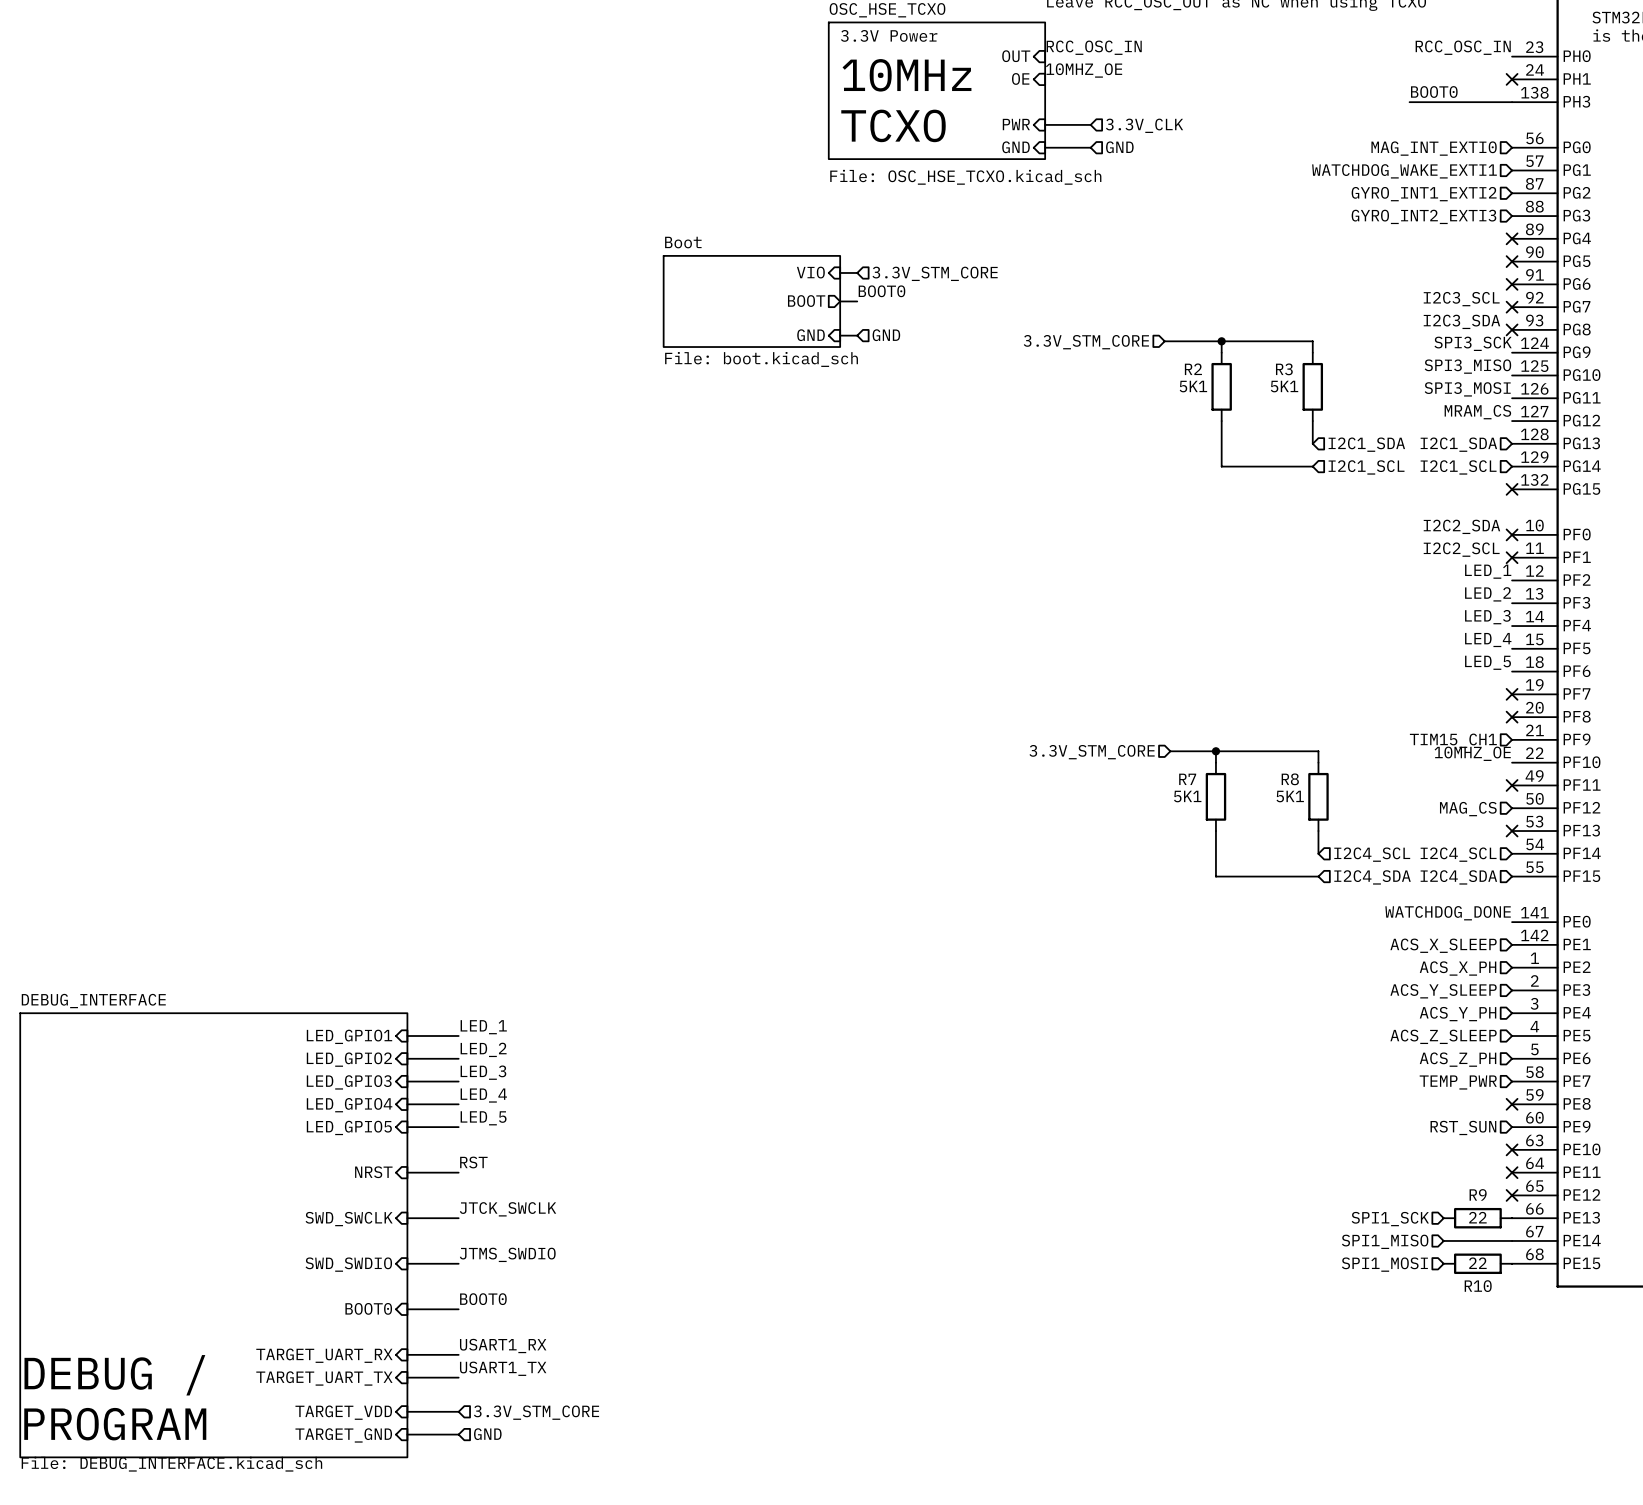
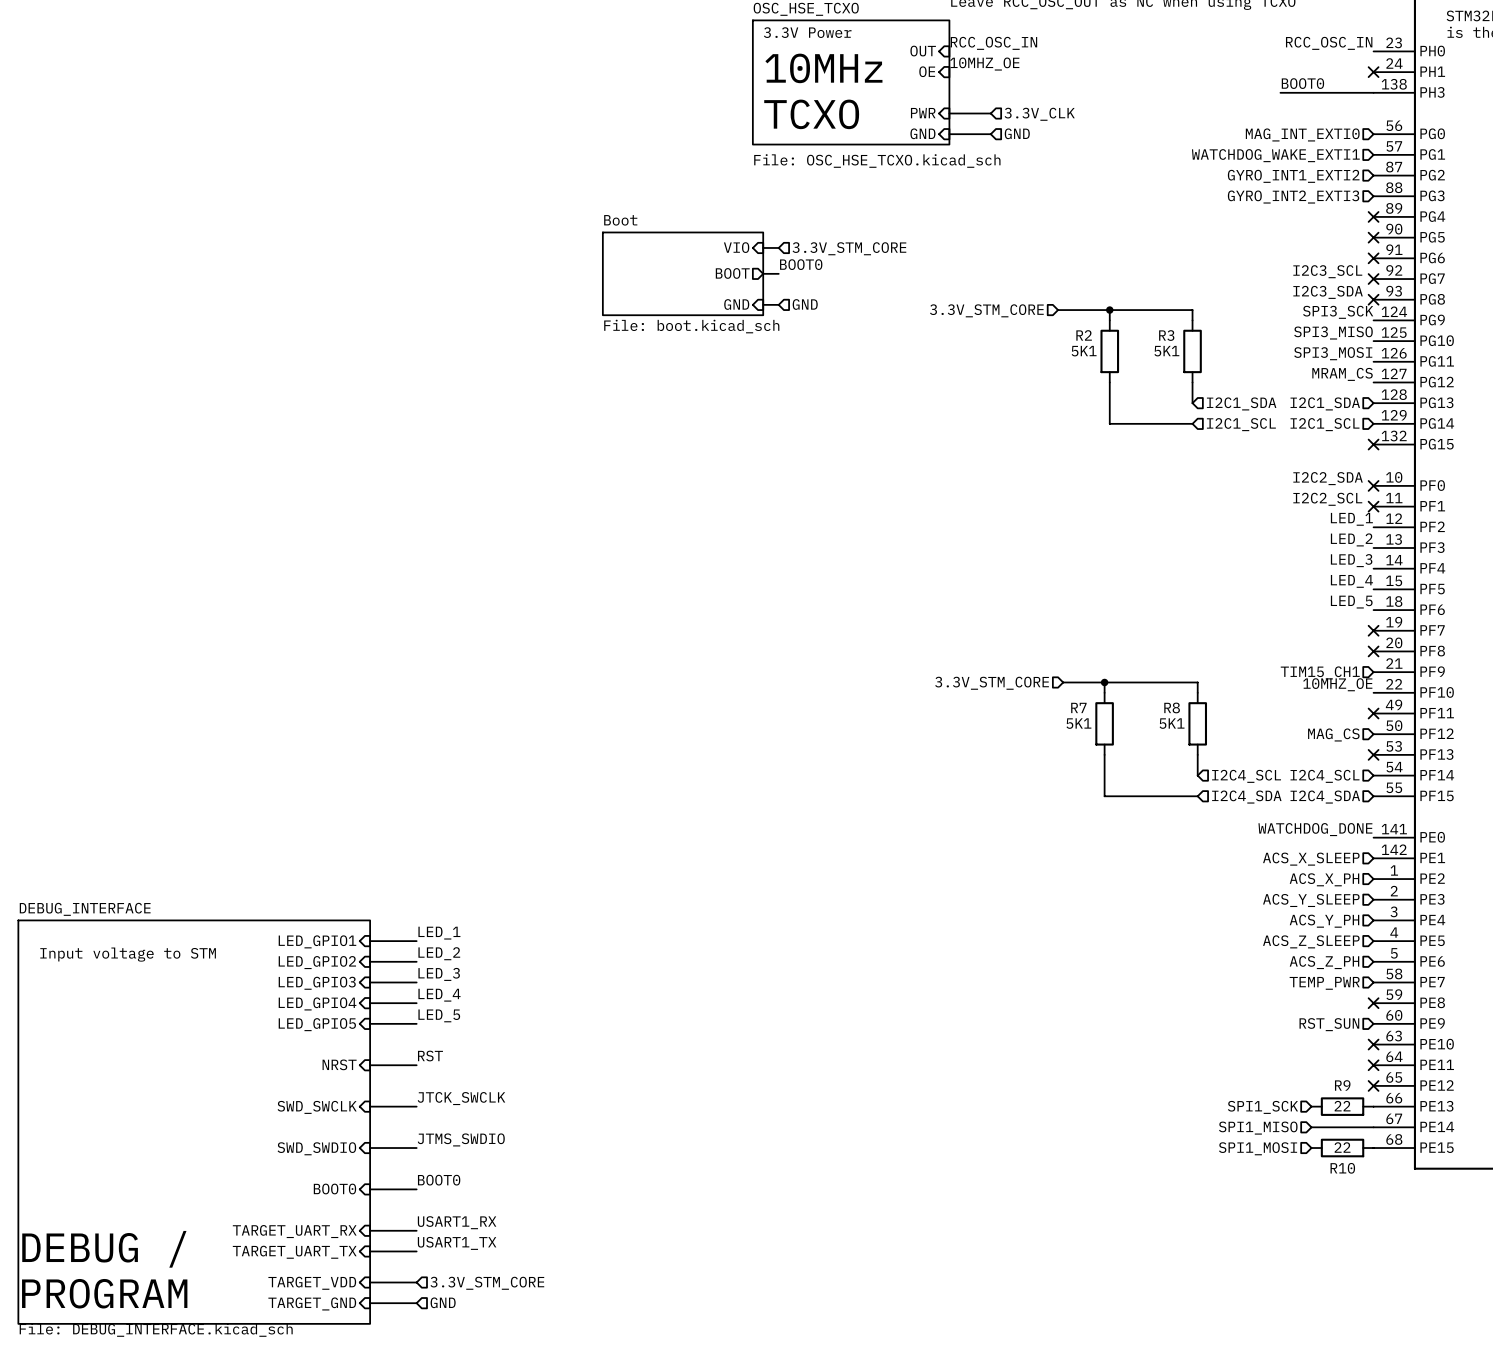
text: none -> Input voltage to STM (128, 954)

